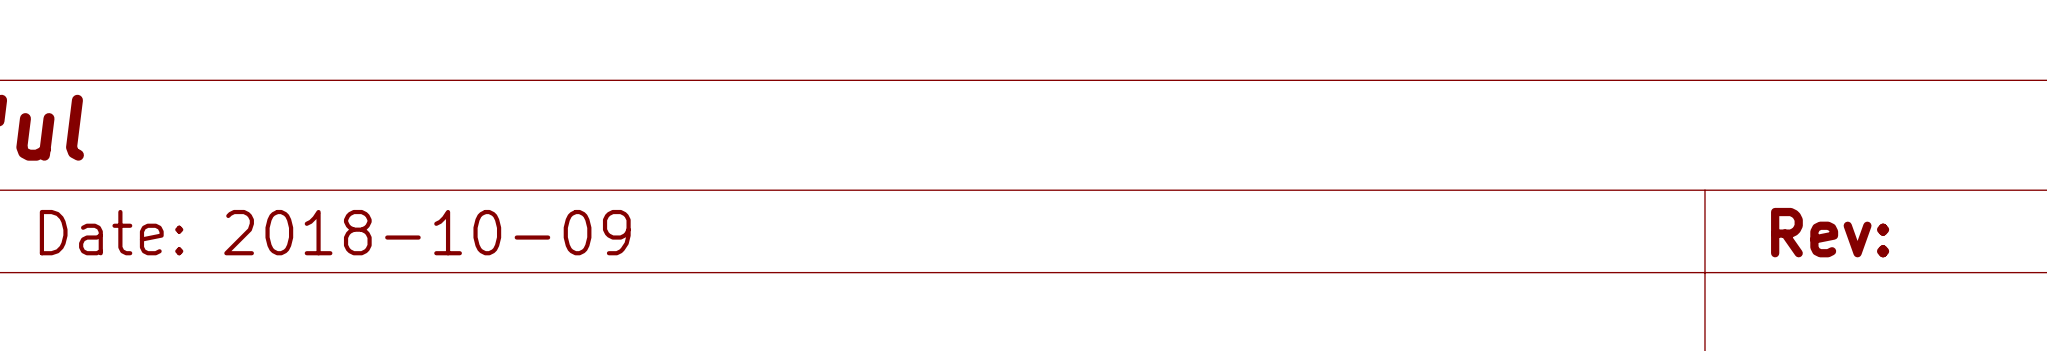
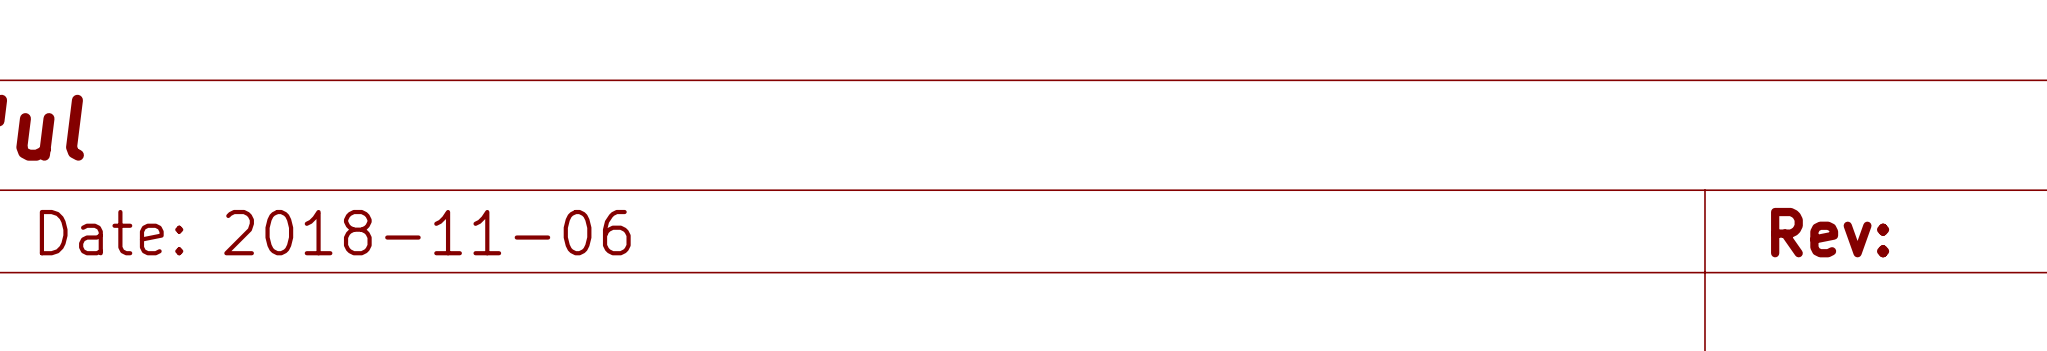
title block: Date: 2018-10-09 (335, 232) -> Date: 2018-11-06 (335, 232)

